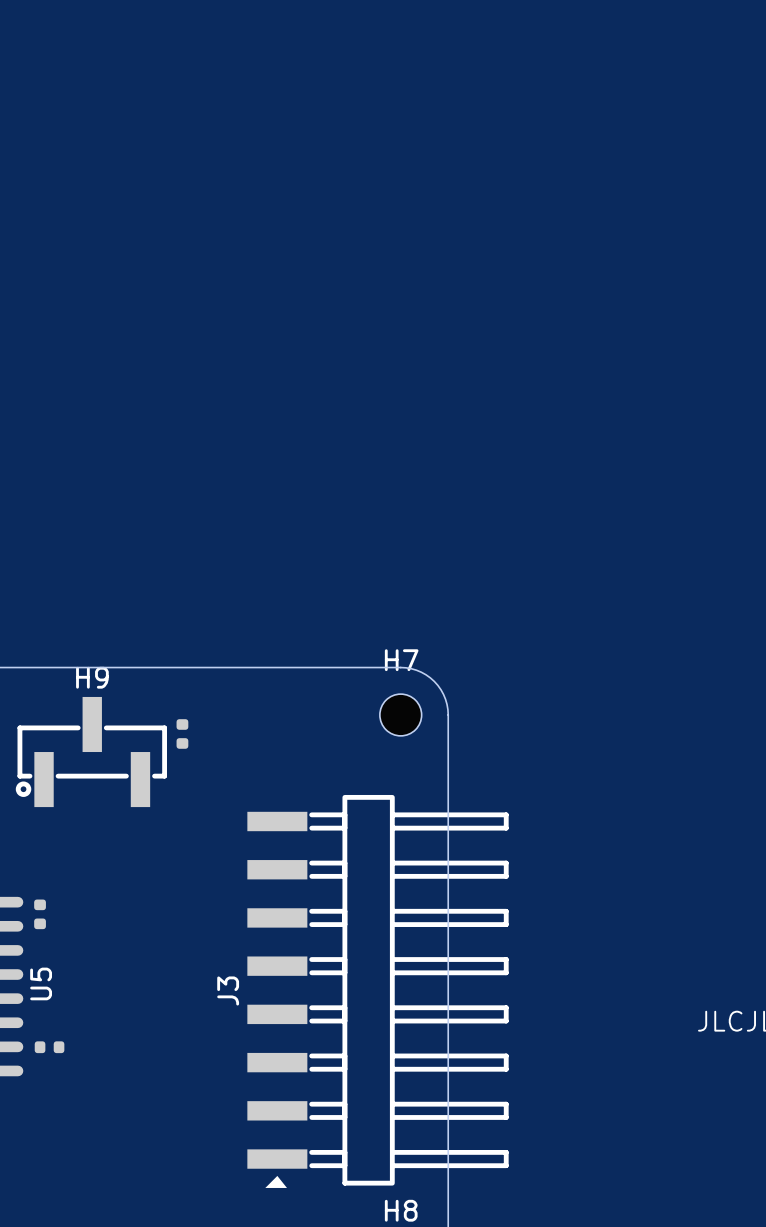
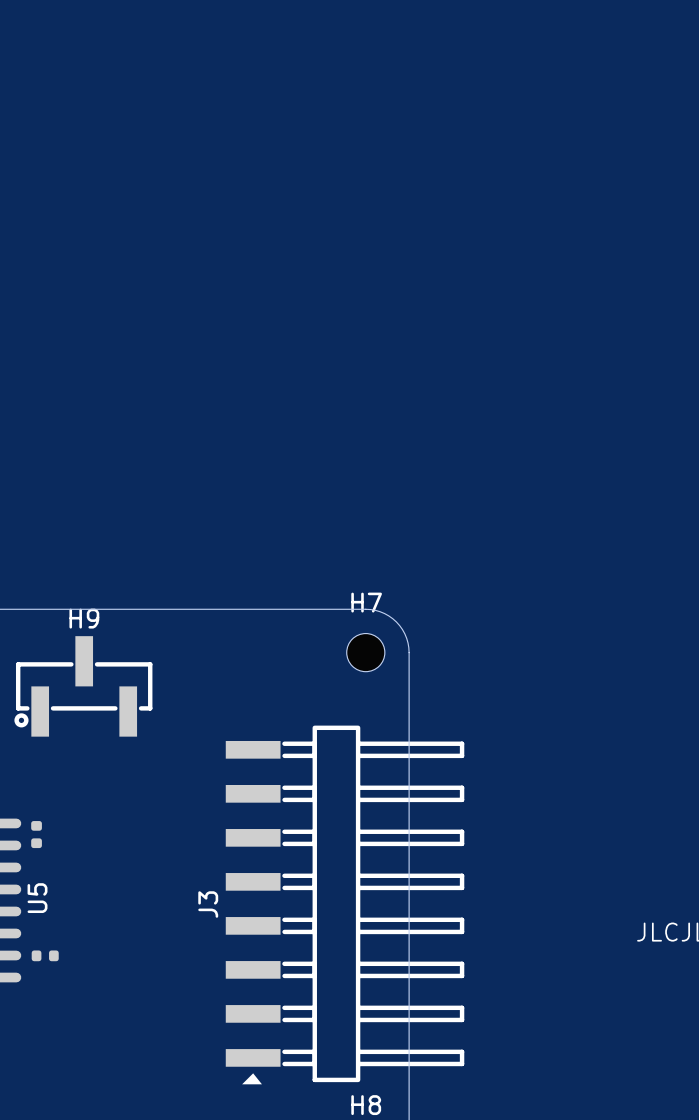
part: (182, 733) -> none

